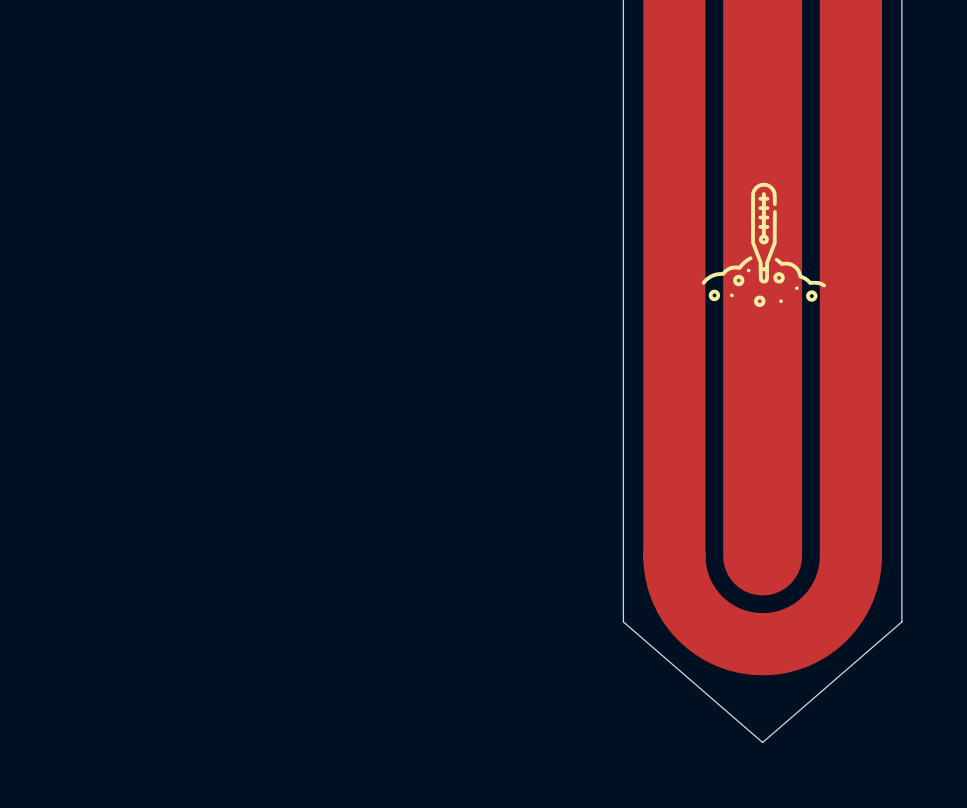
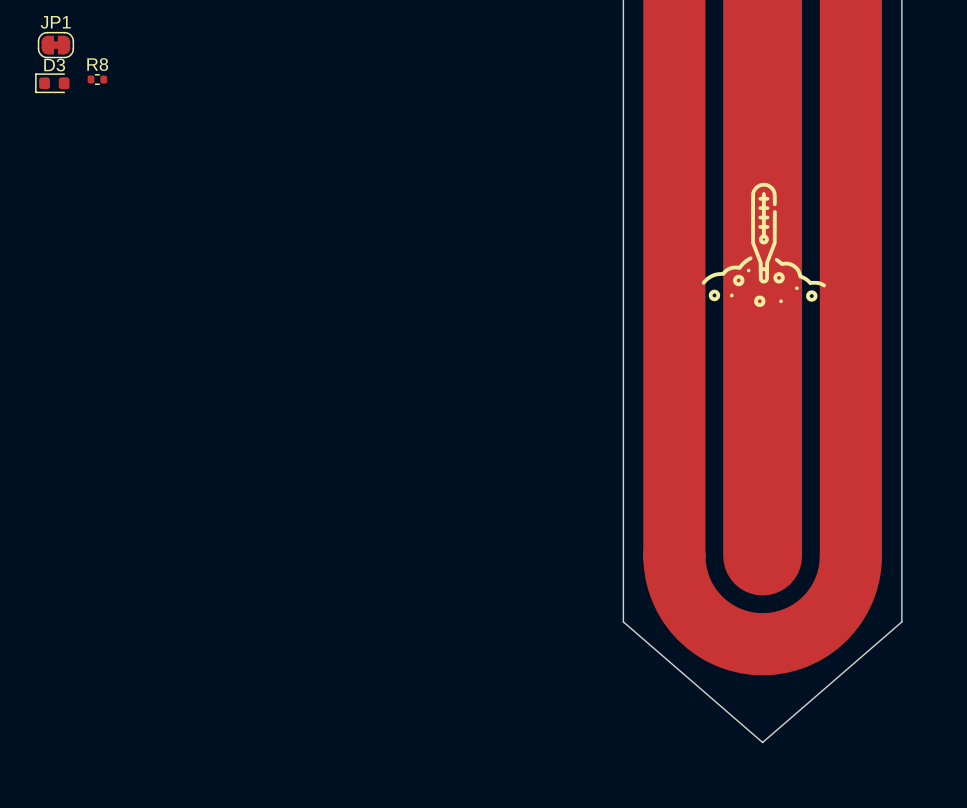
JP1: none -> (55, 45)
R8: none -> (97, 79)
D3: none -> (52, 83)

